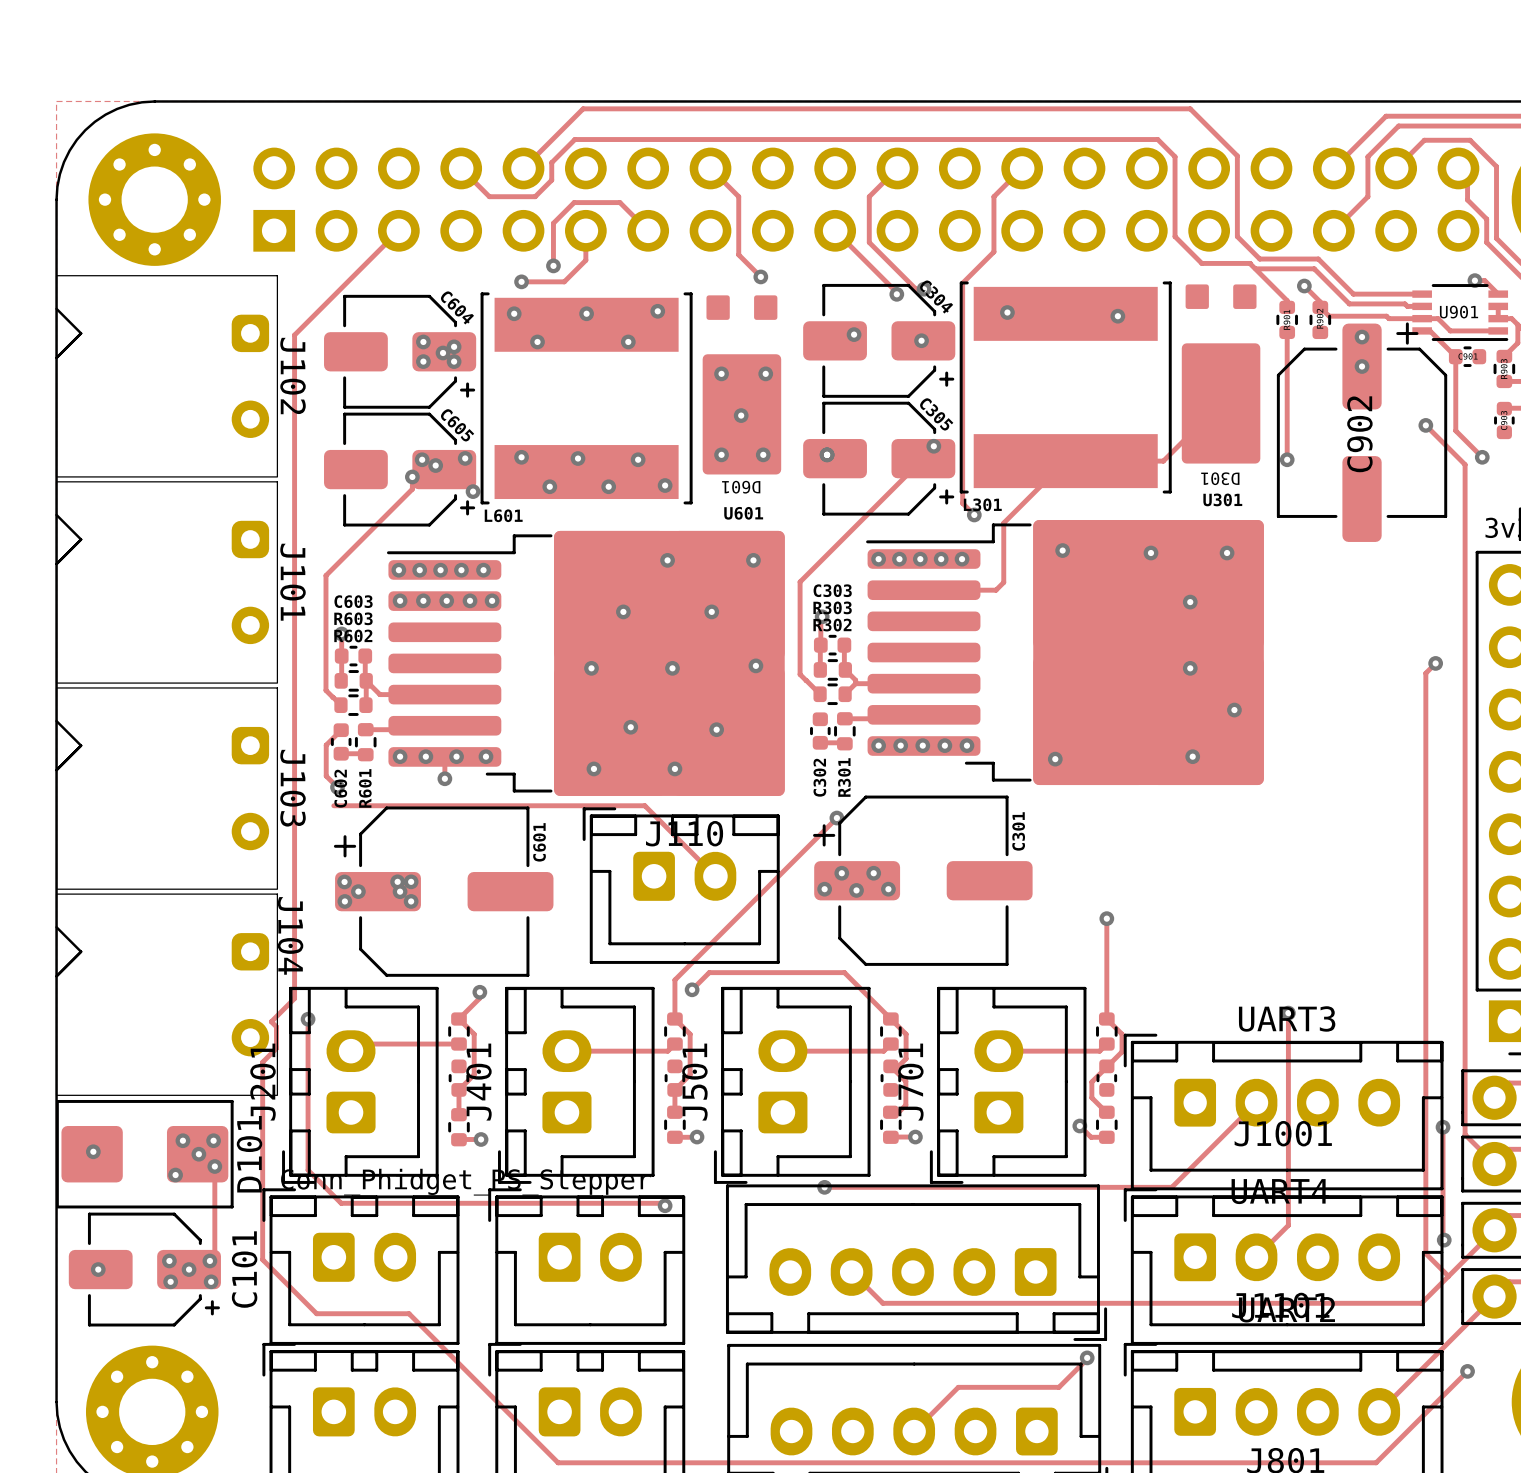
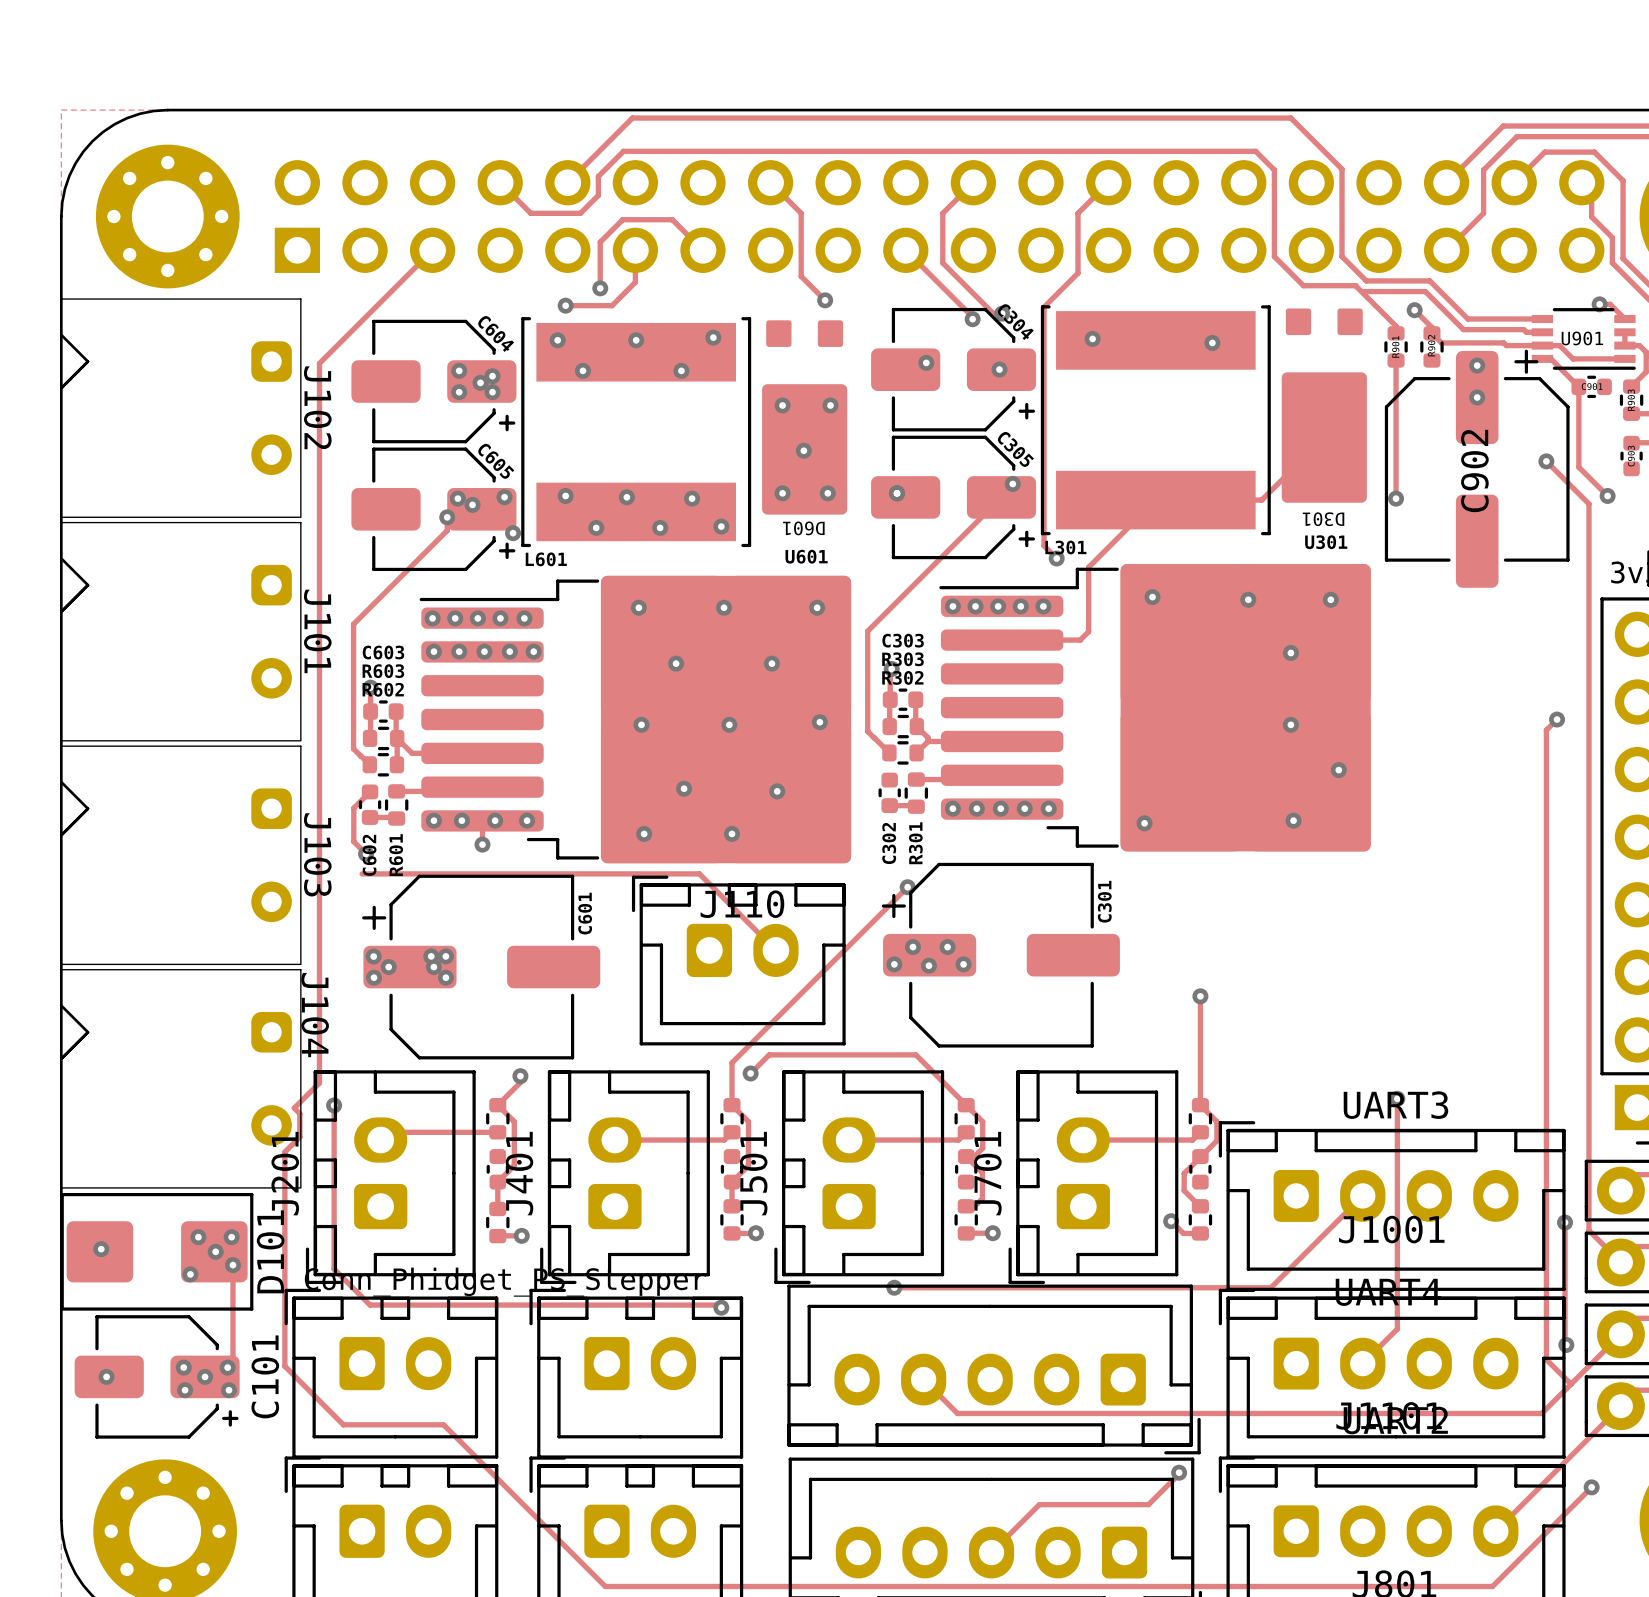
via: none -> (638, 607)

